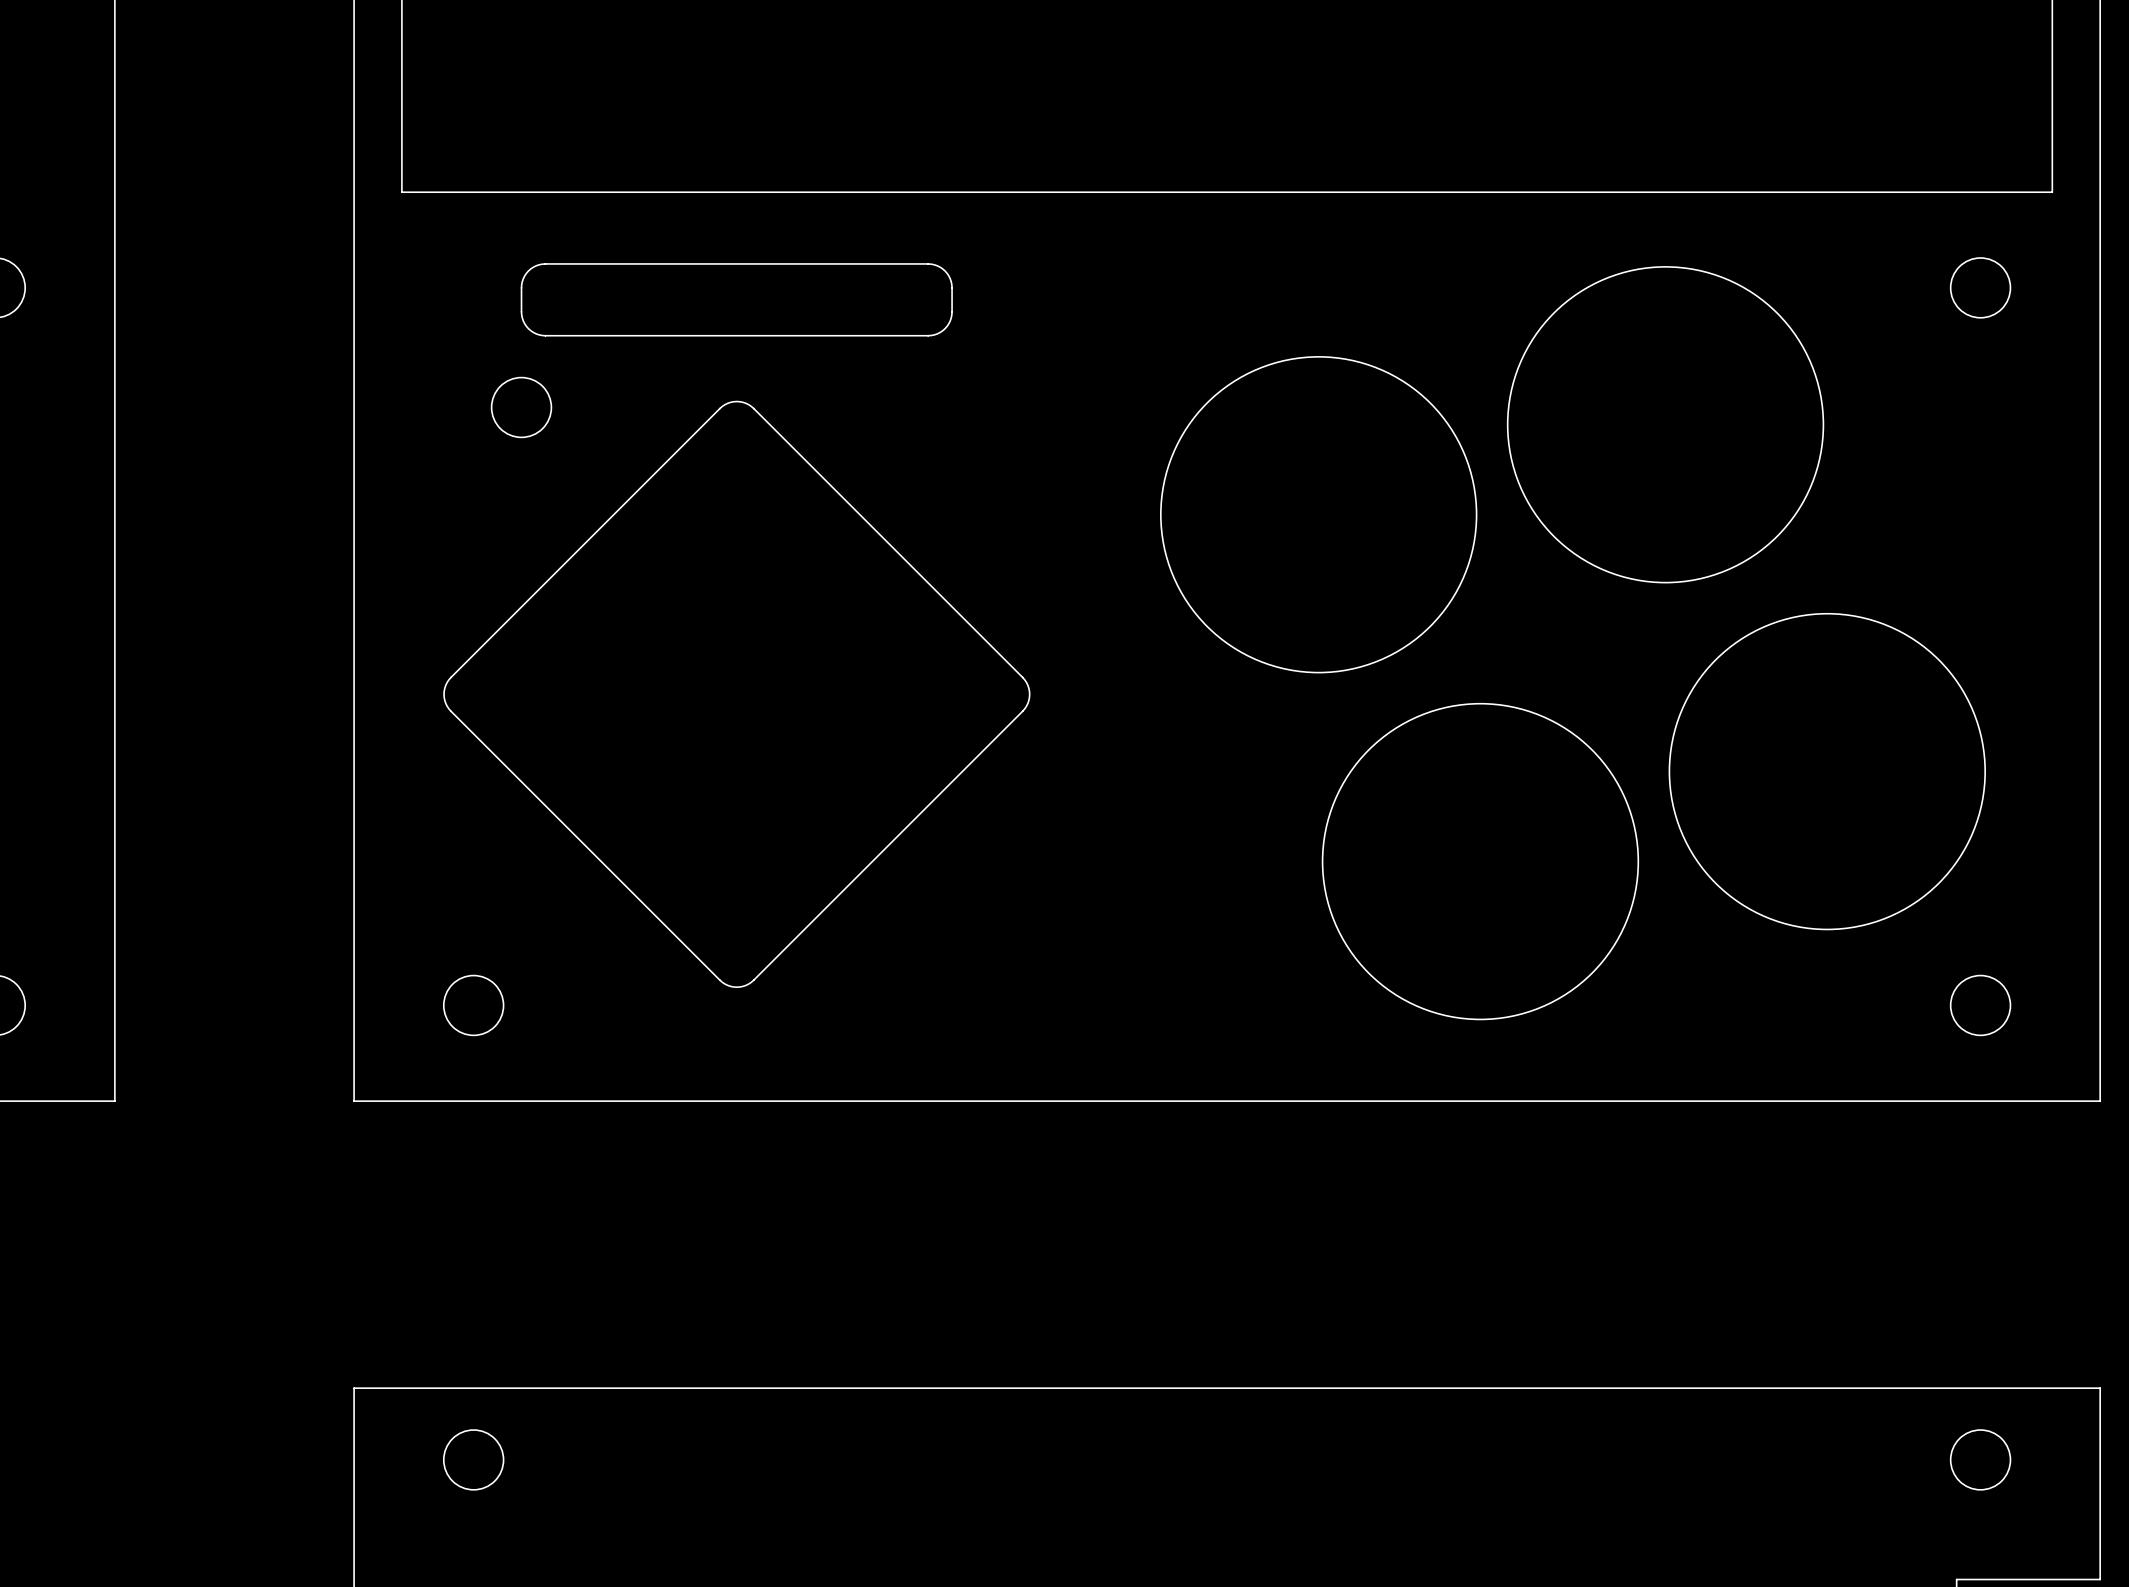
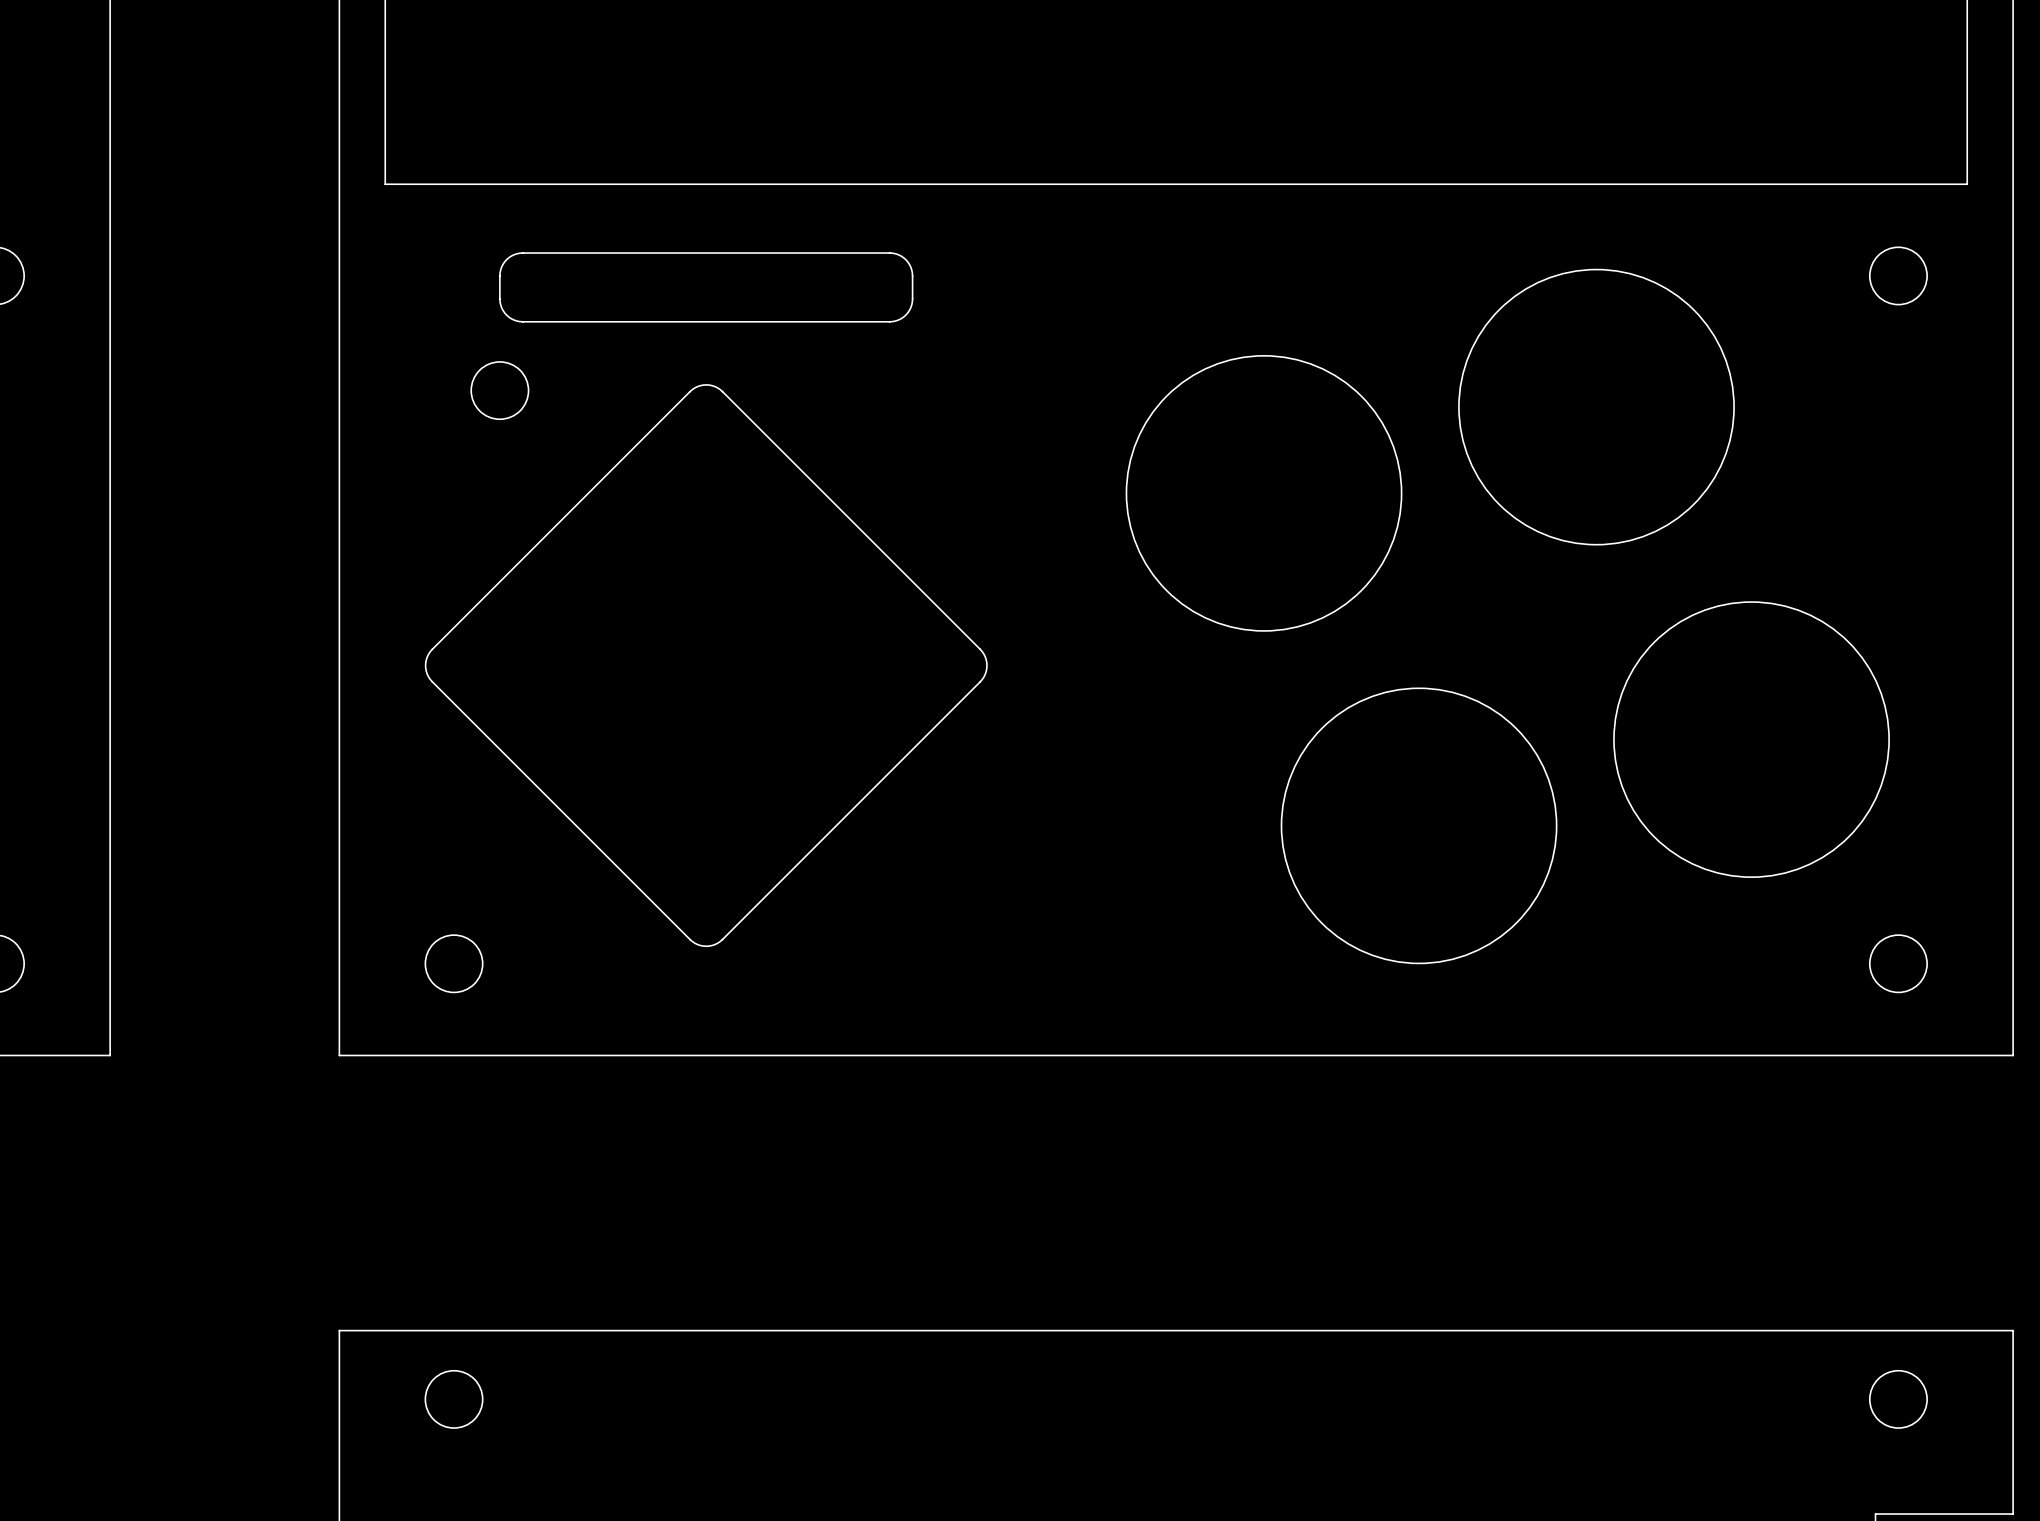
round board edge size: [1507, 266, 1824, 583] -> [1458, 269, 1735, 545]
round board edge size: [1160, 356, 1477, 673] -> [1126, 355, 1402, 632]
round board edge size: [1669, 613, 1986, 930] -> [1613, 601, 1890, 878]
round board edge size: [1322, 703, 1639, 1020] -> [1281, 688, 1557, 964]

